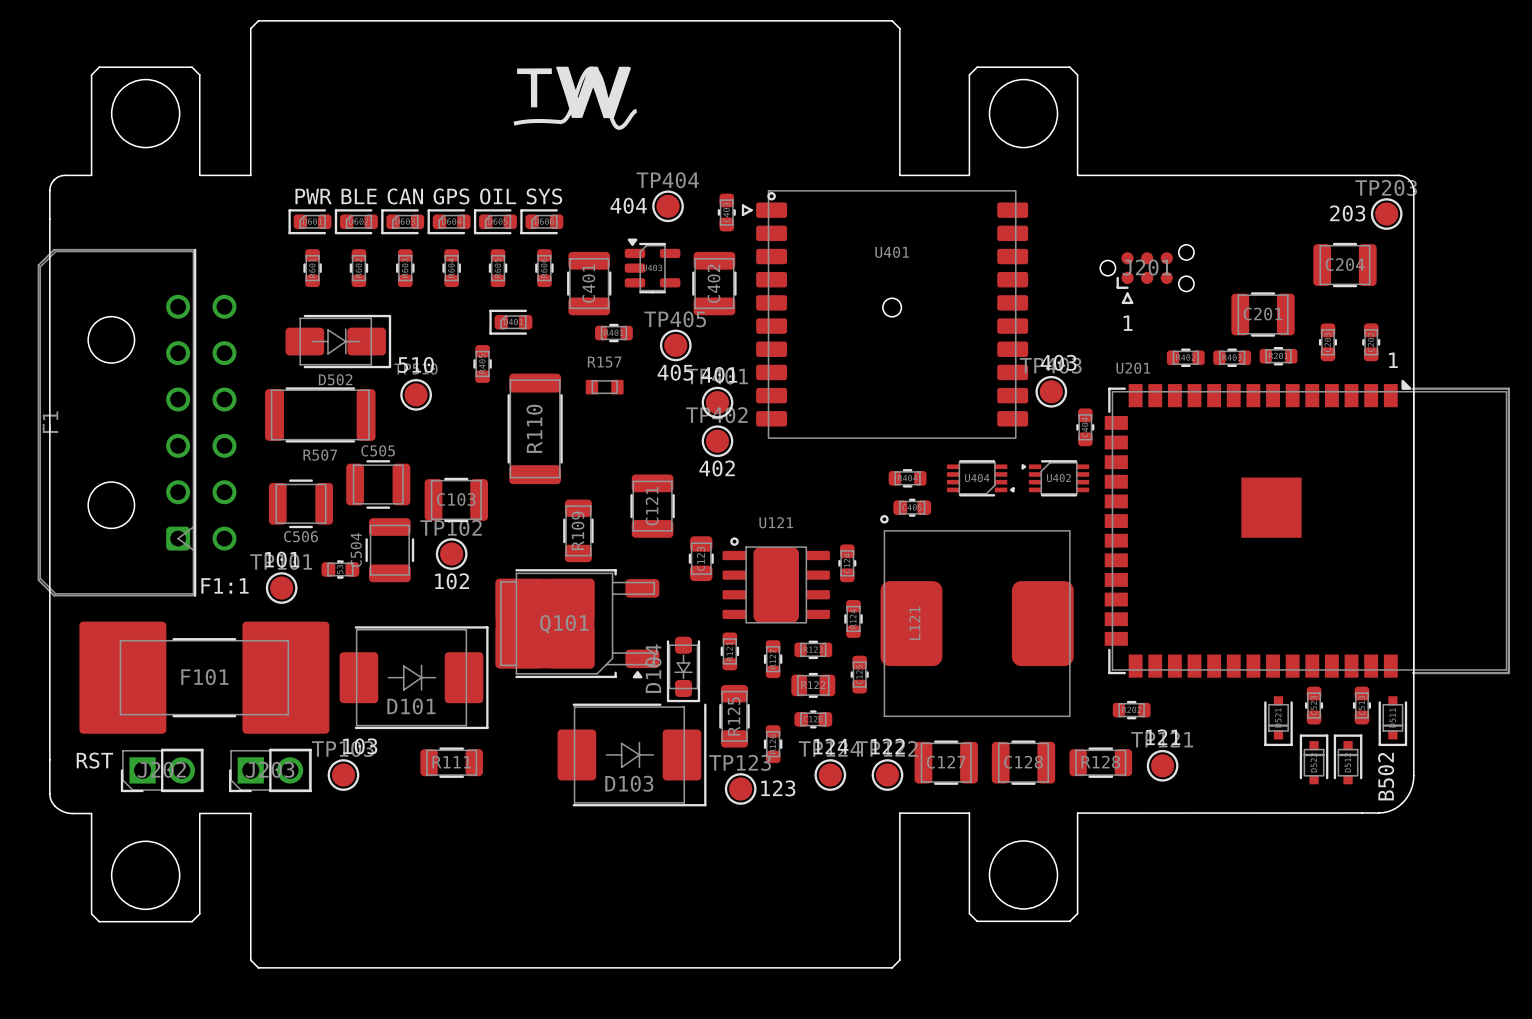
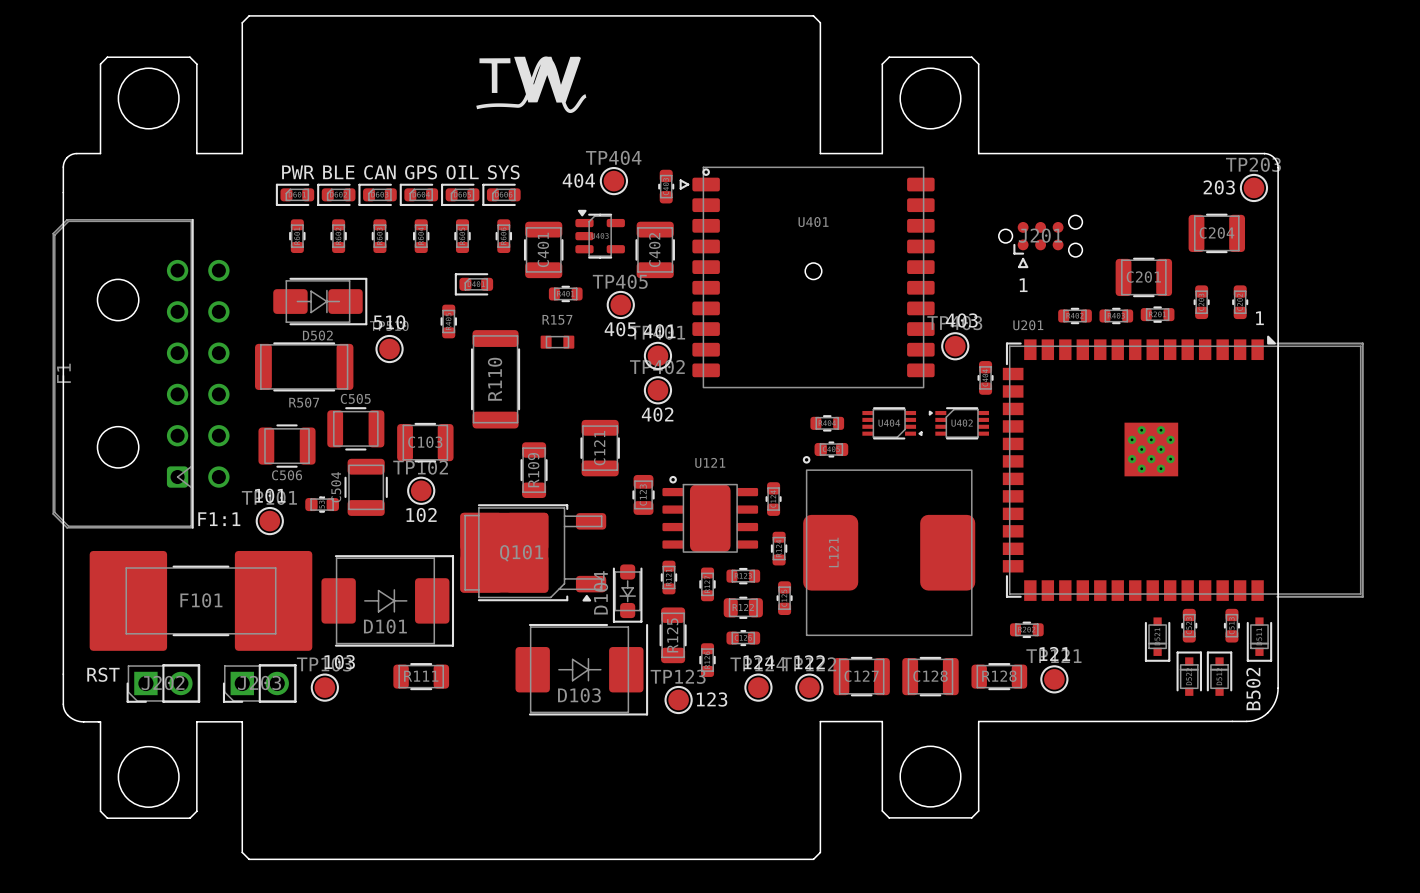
U201 footprint: [1104, 379, 1511, 678] -> [1002, 335, 1364, 601]

